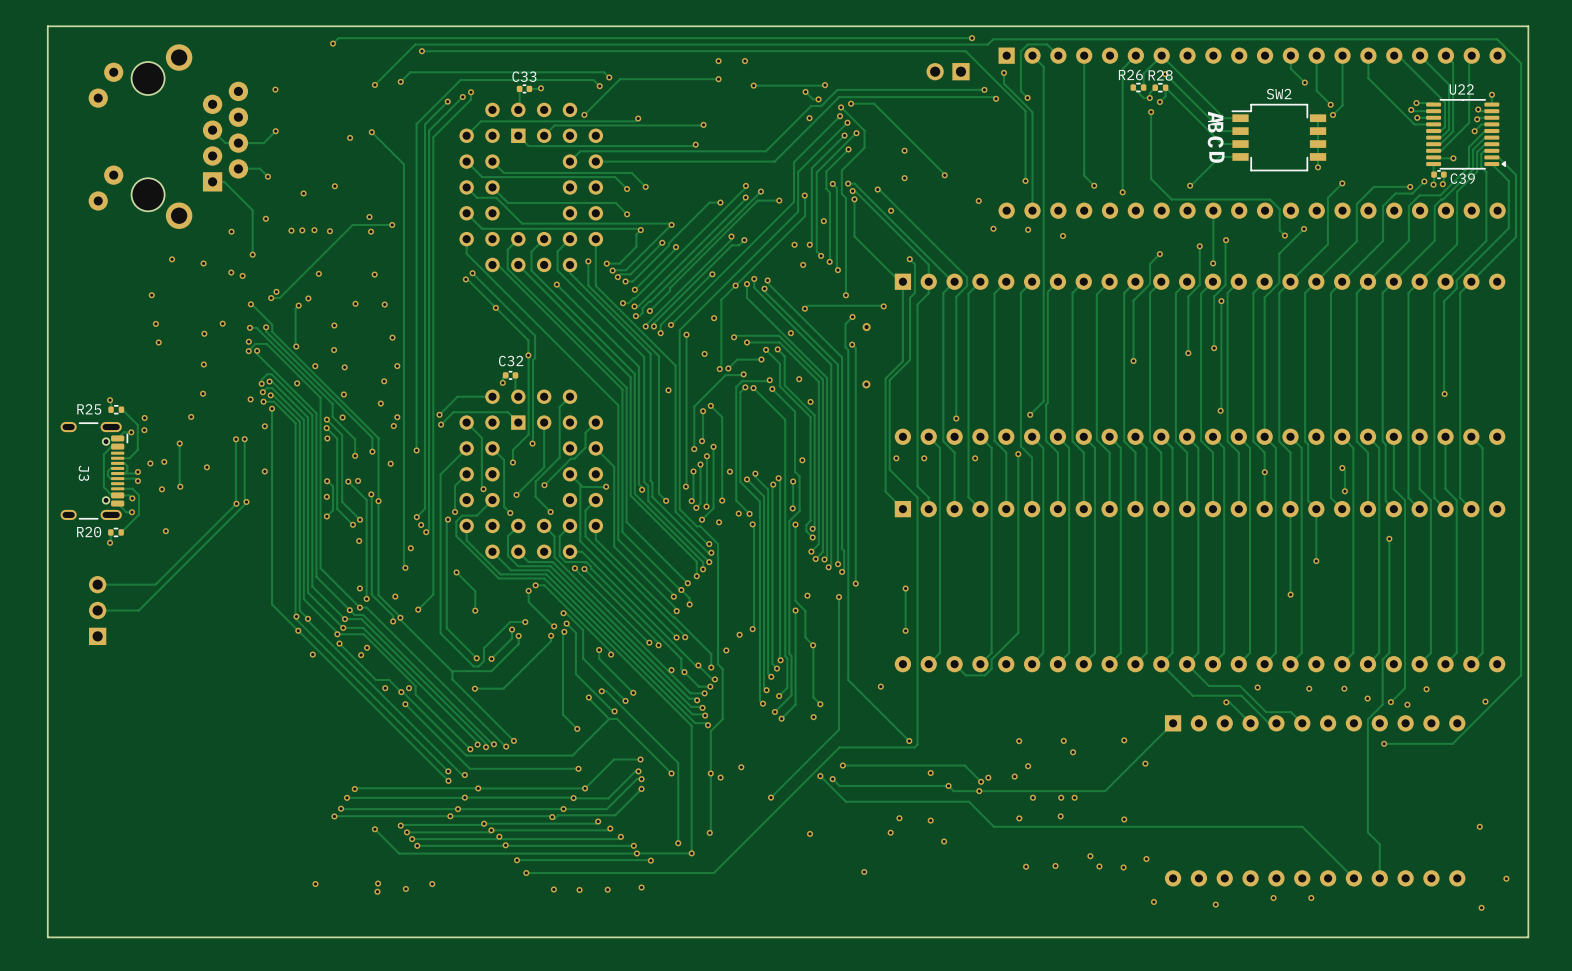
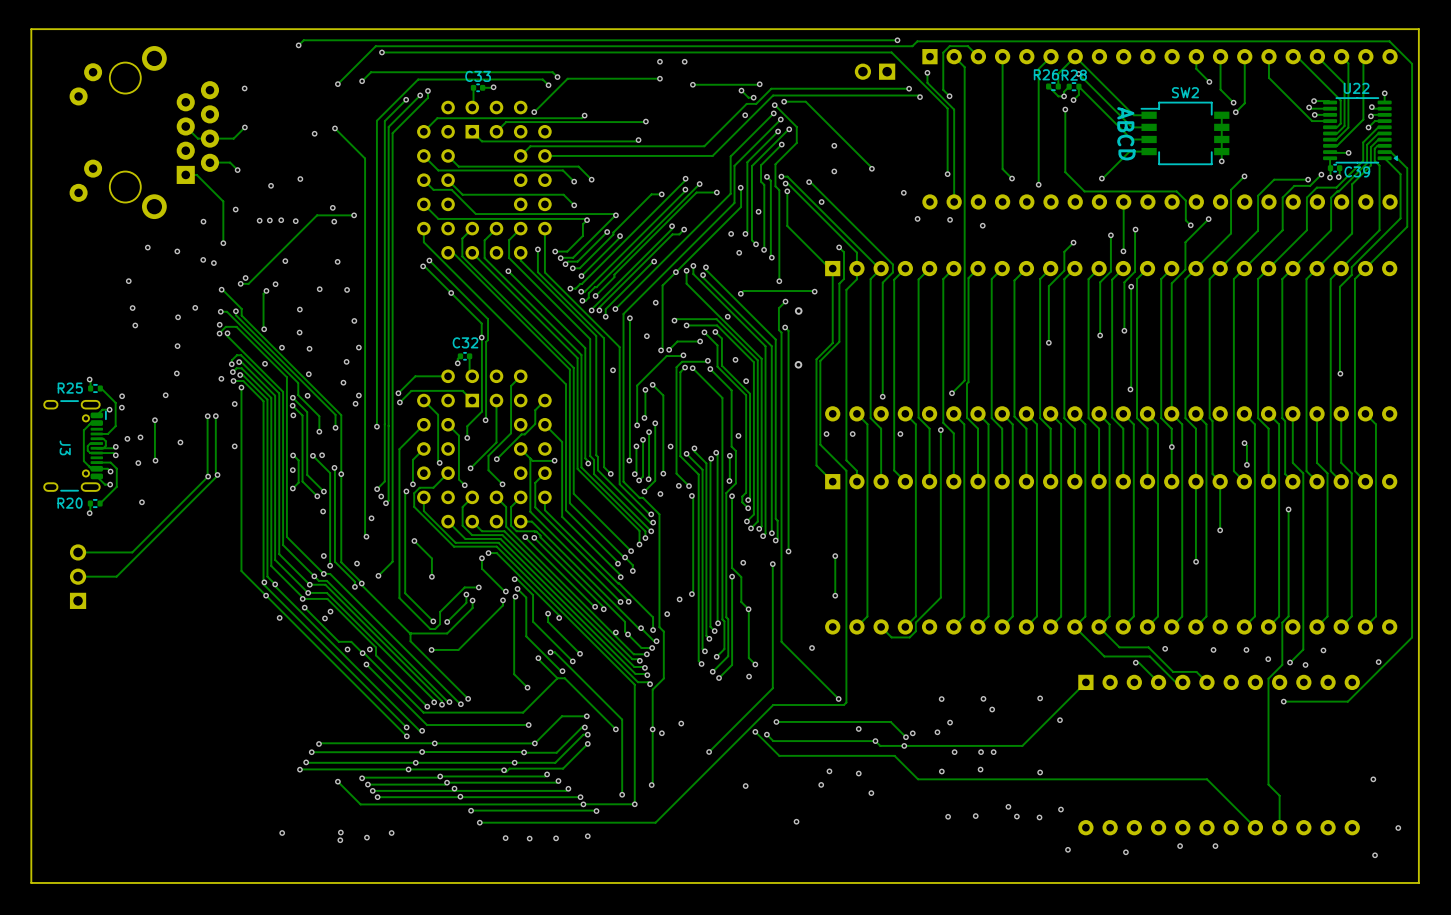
via: (390, 463) -> none

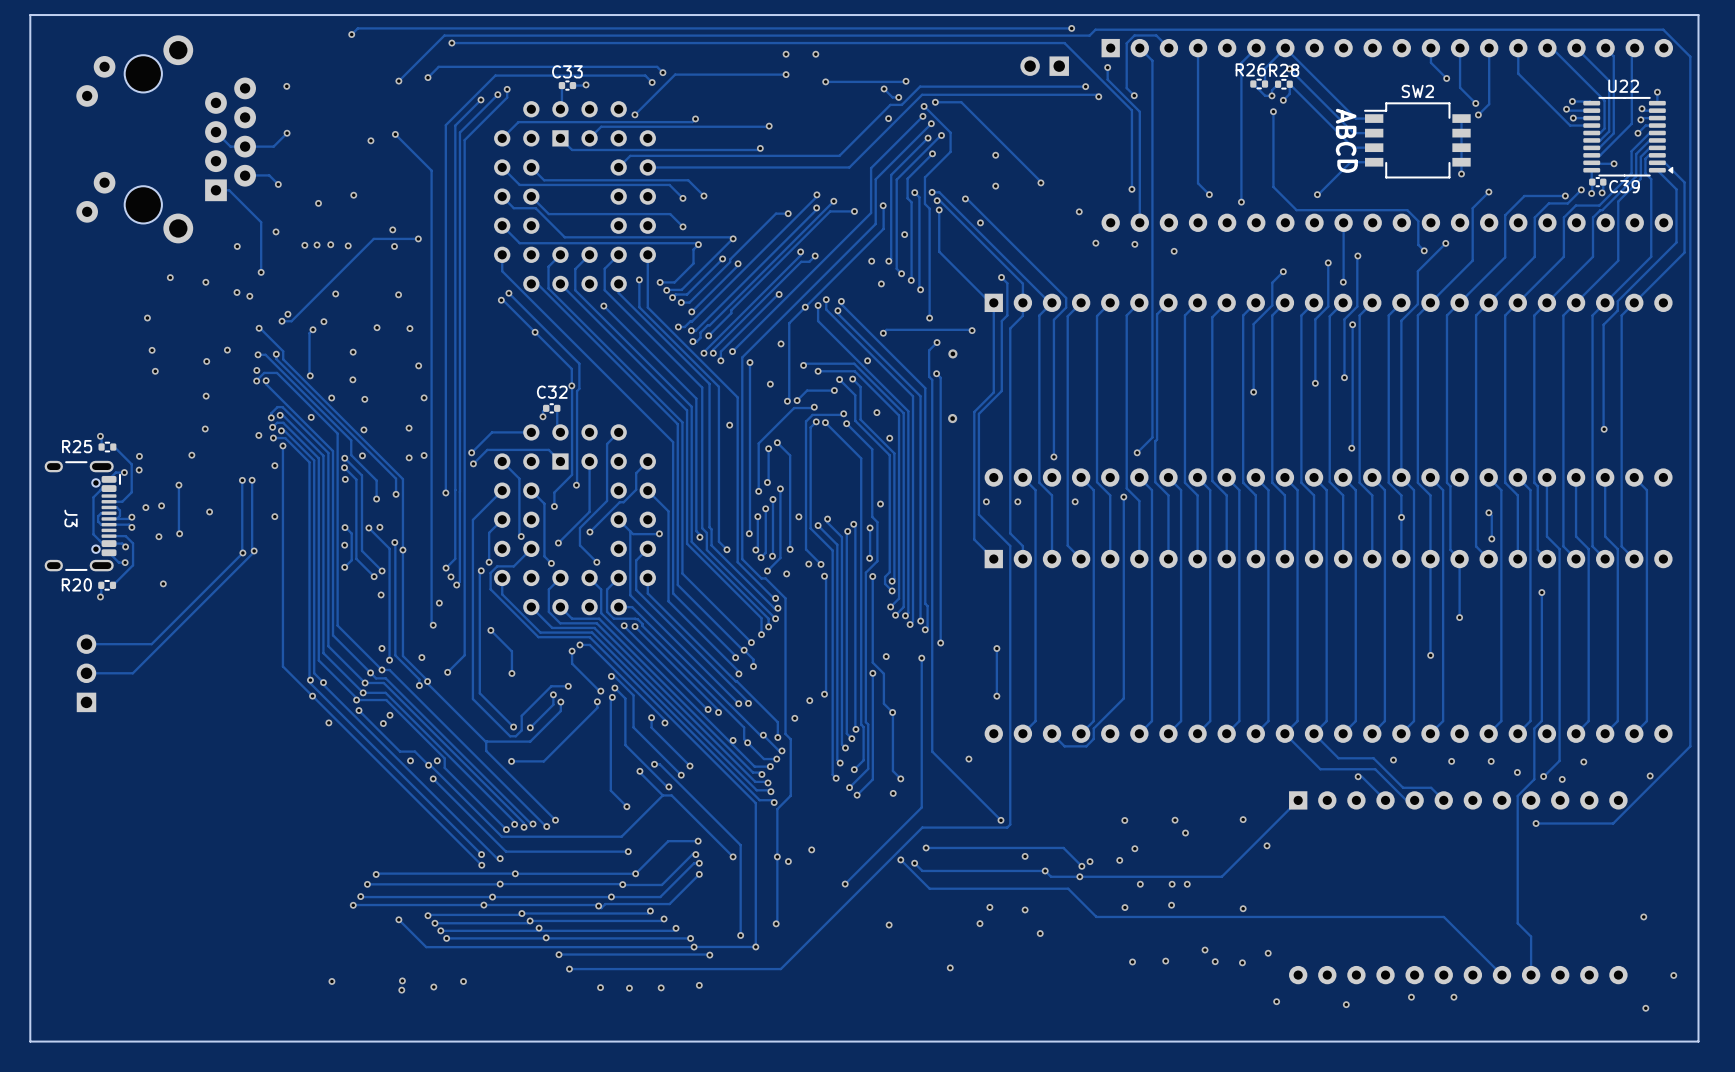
via: (346, 361) -> none
via: none -> (409, 428)
via: (343, 382) -> none
via: none -> (409, 457)
via: (355, 403) -> none

